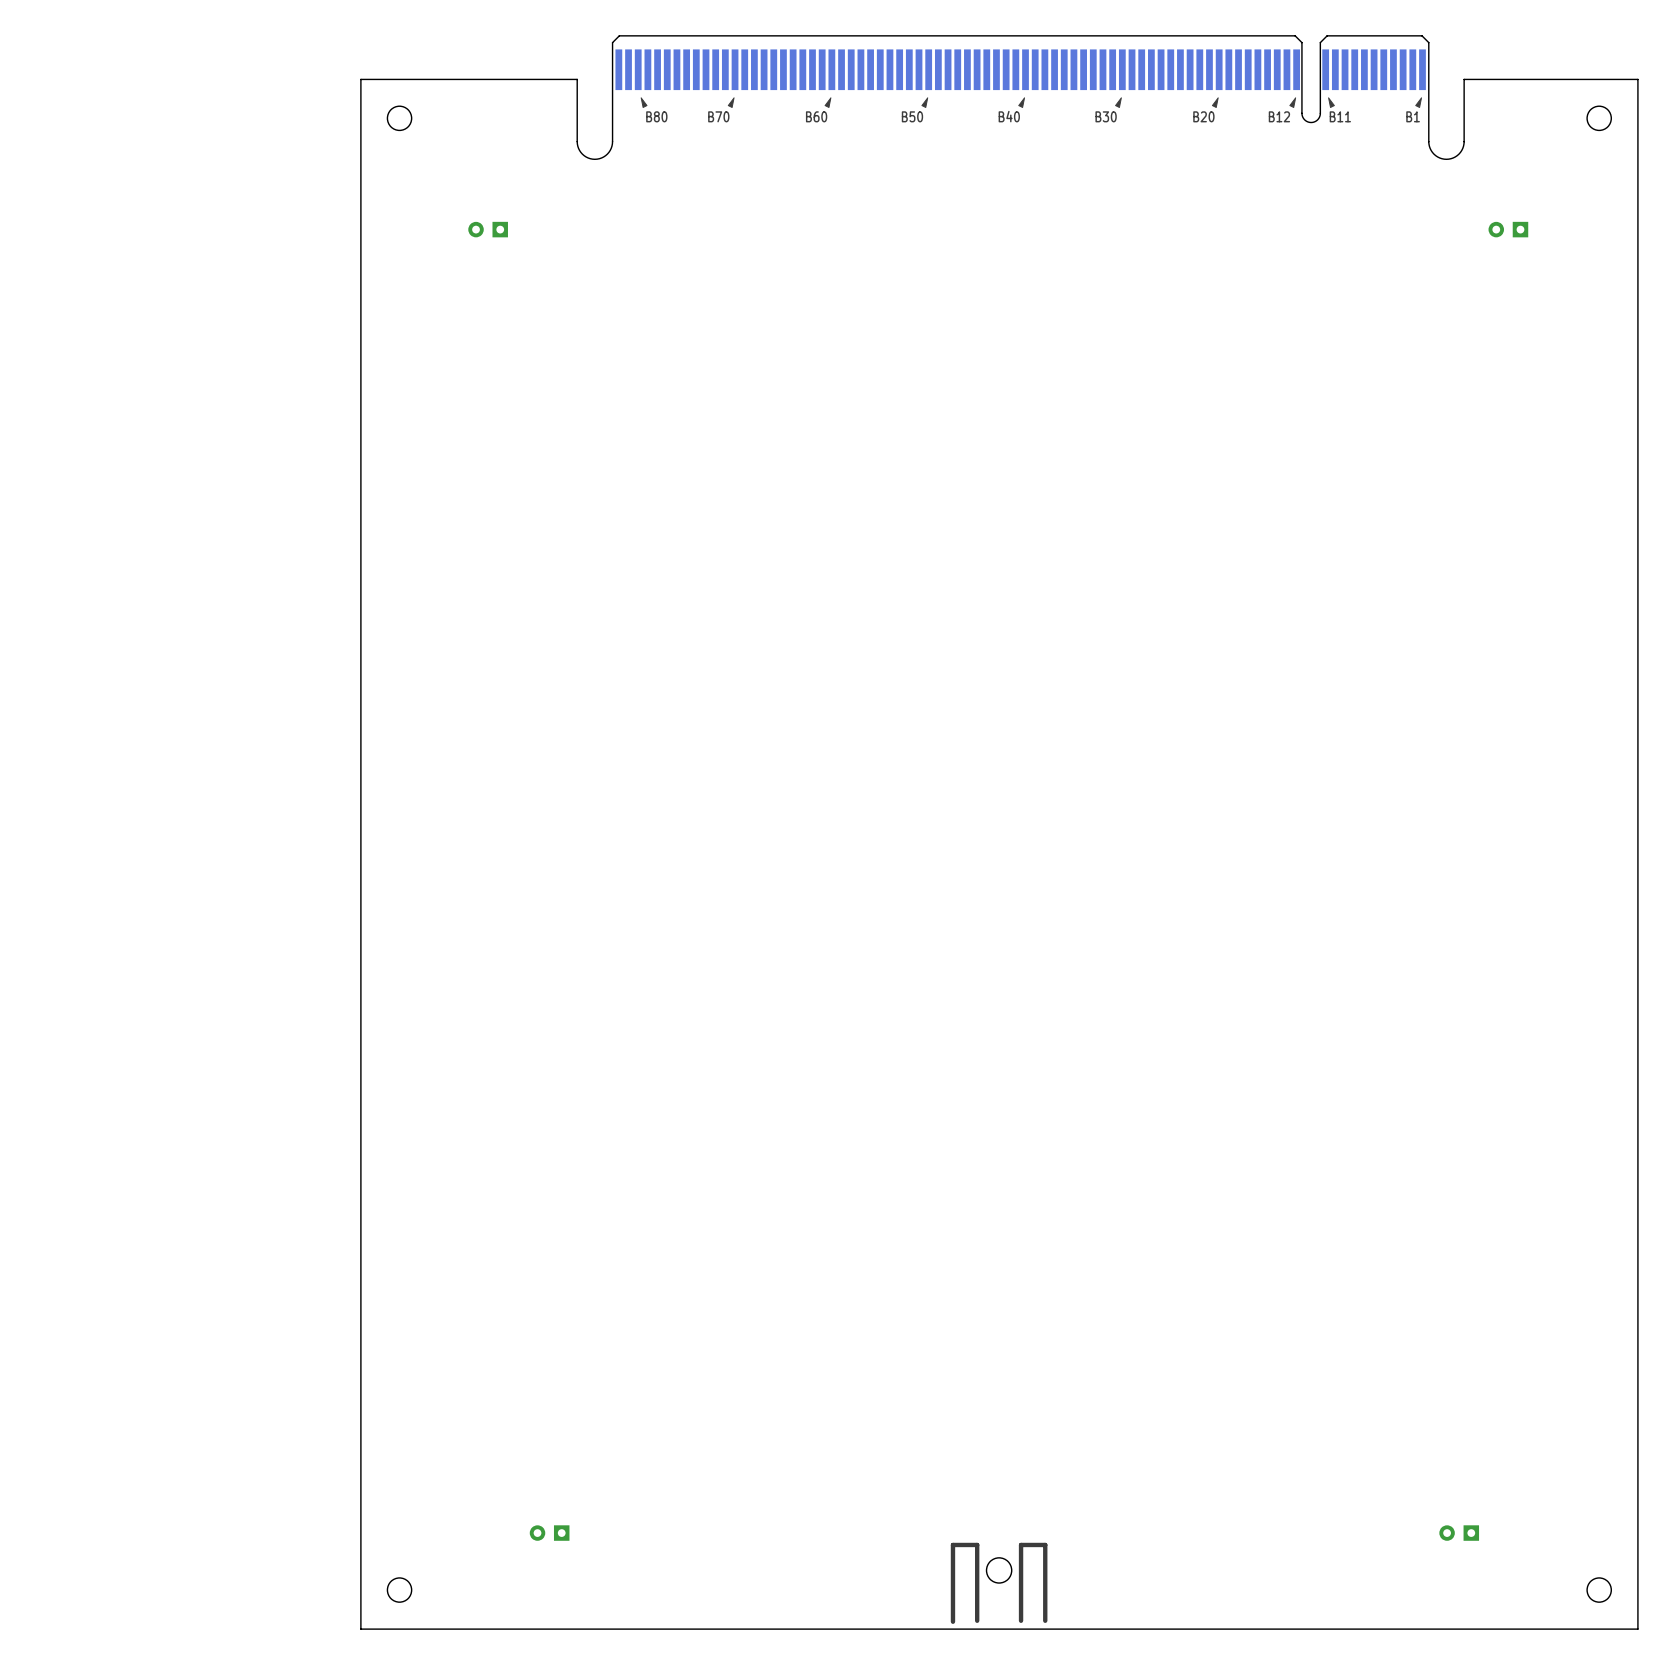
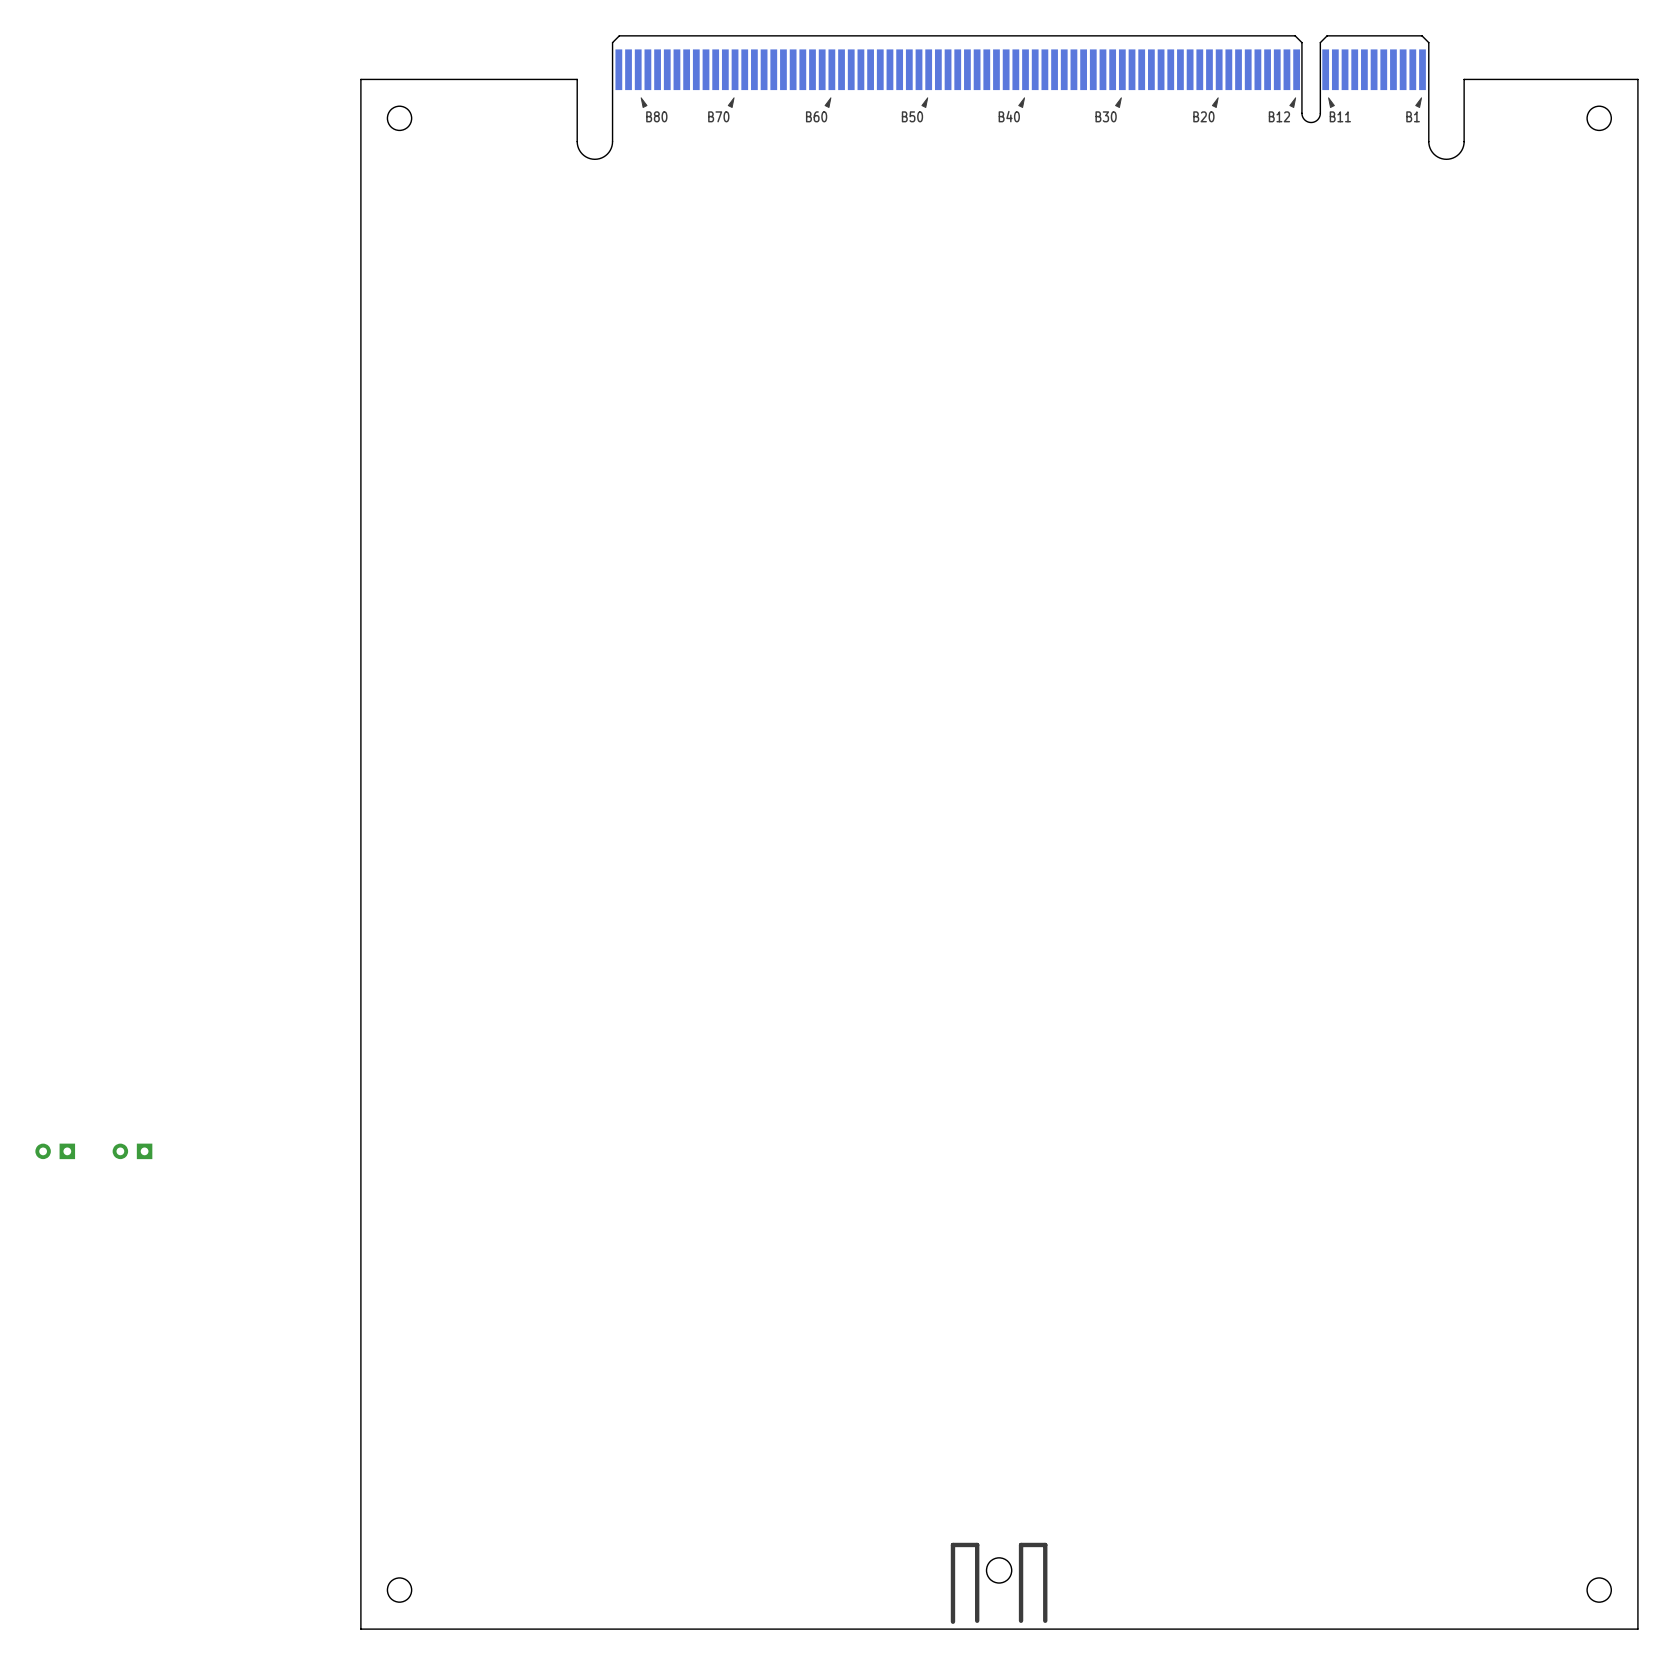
part: (488, 229) -> none
part: (1508, 229) -> none
part: none -> (55, 1151)
part: none -> (132, 1151)
part: (549, 1533) -> none
part: (1459, 1533) -> none

